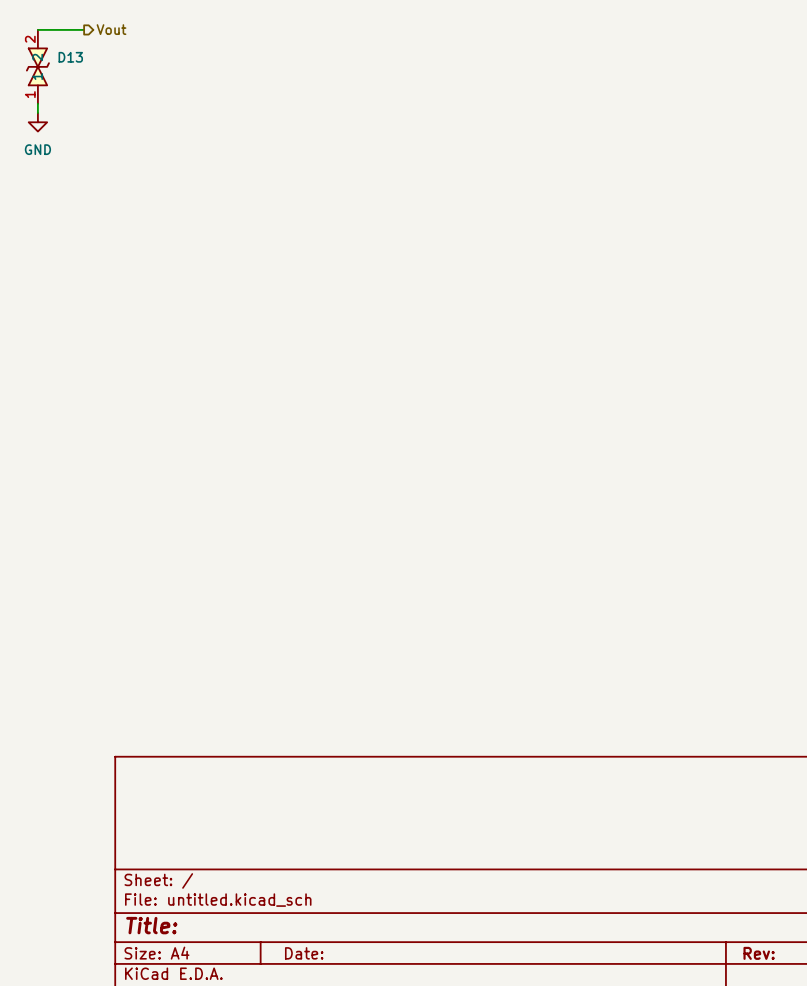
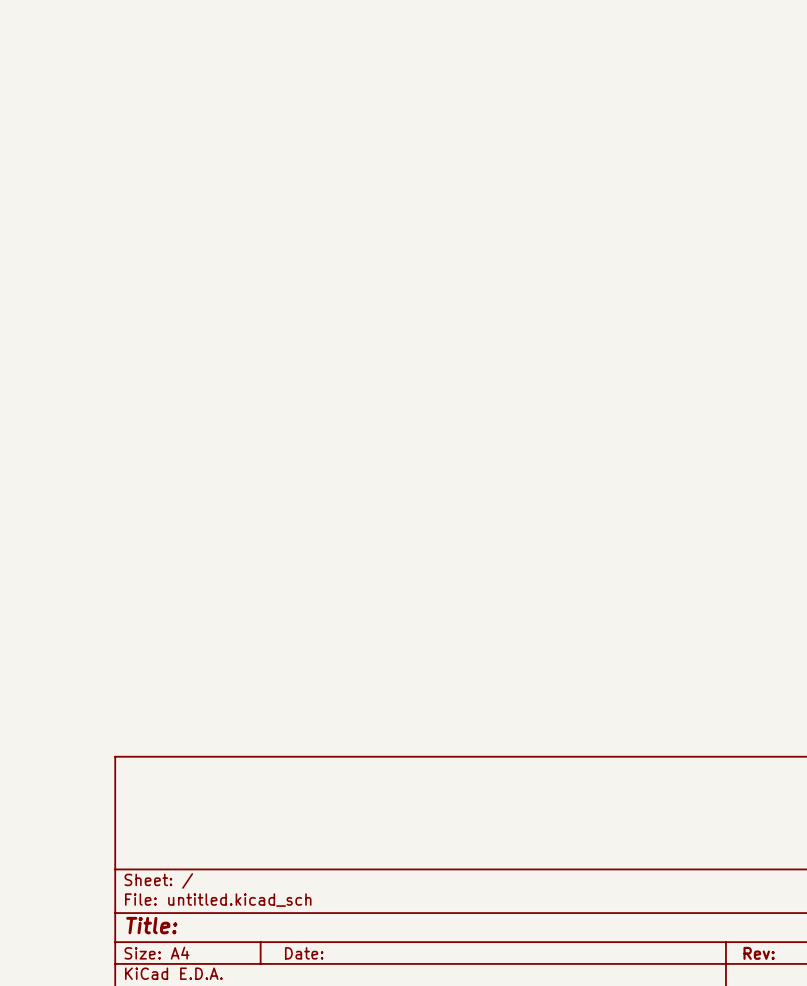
wire: (37, 29) (84, 29) -> none
hierarchical label: Vout (111, 29) -> none
D13: (37, 66) -> none
wire: (37, 103) (37, 113) -> none
power symbol: GND (37, 122) -> none

